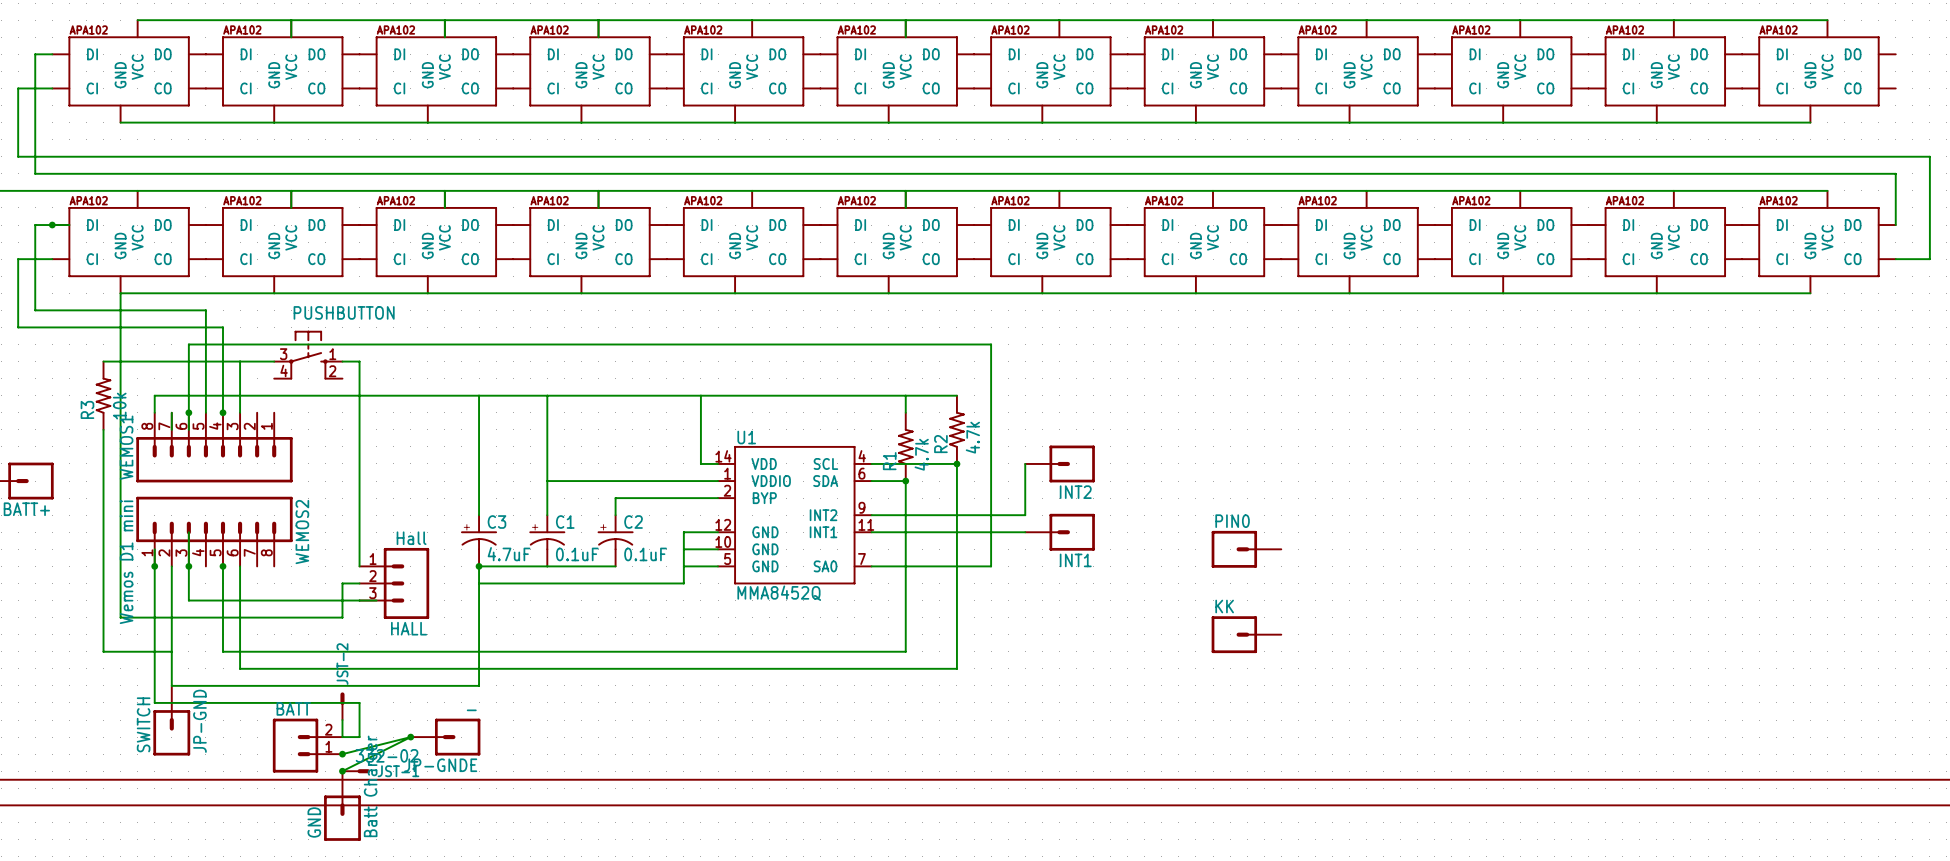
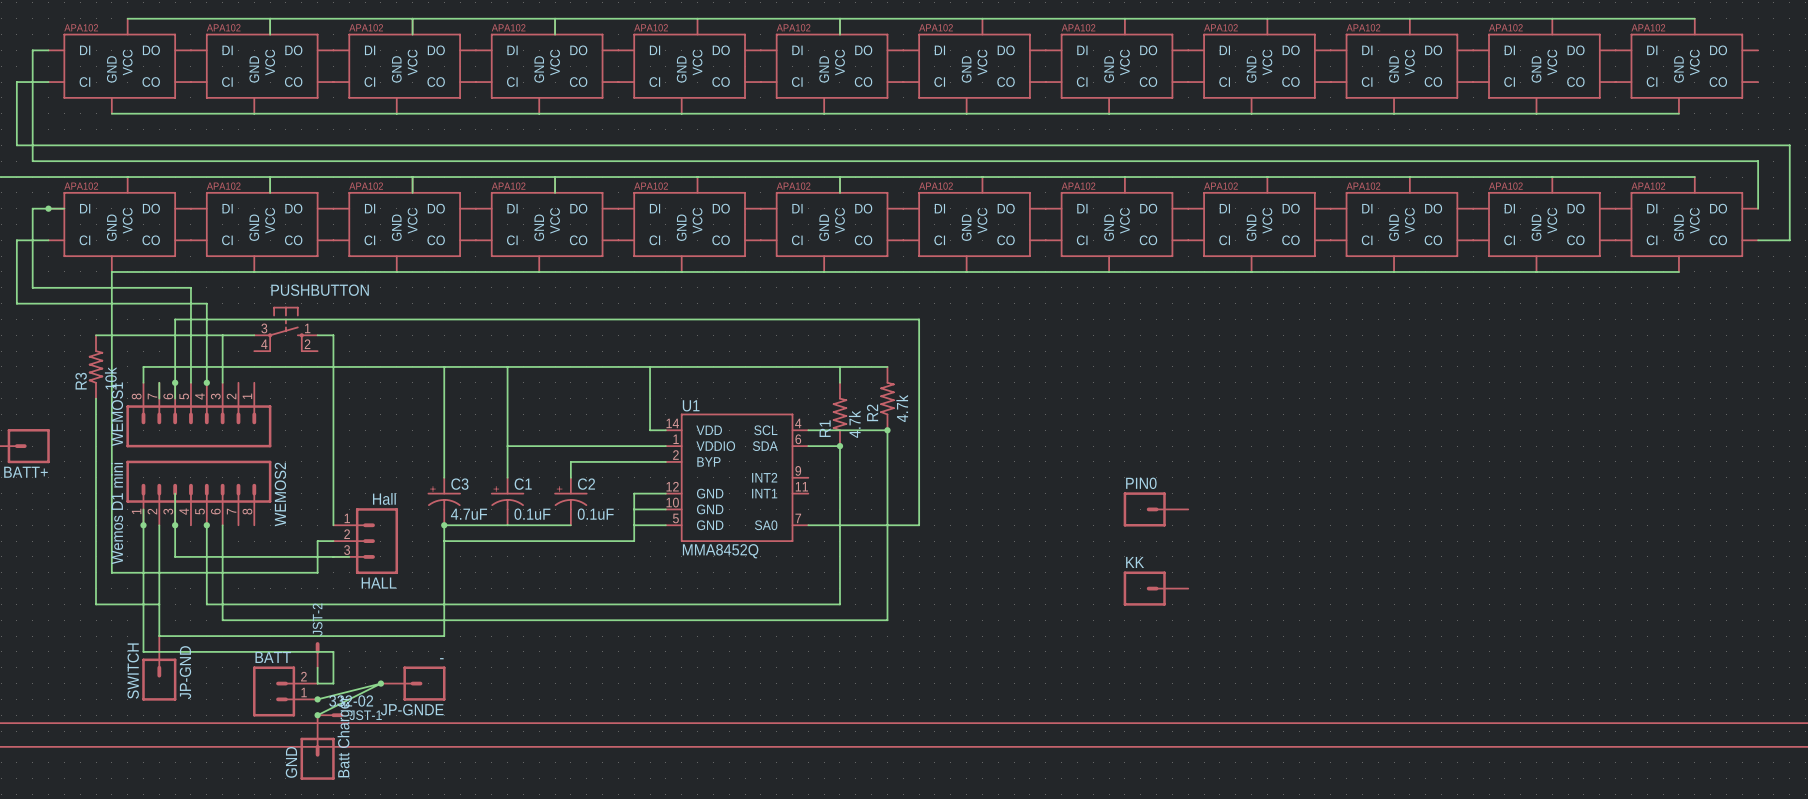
wire: (1025, 463) (1025, 515) (871, 515) -> none
INT2: (1060, 463) -> none
wire: (871, 532) (1025, 532) -> none
INT1: (1060, 532) -> none

